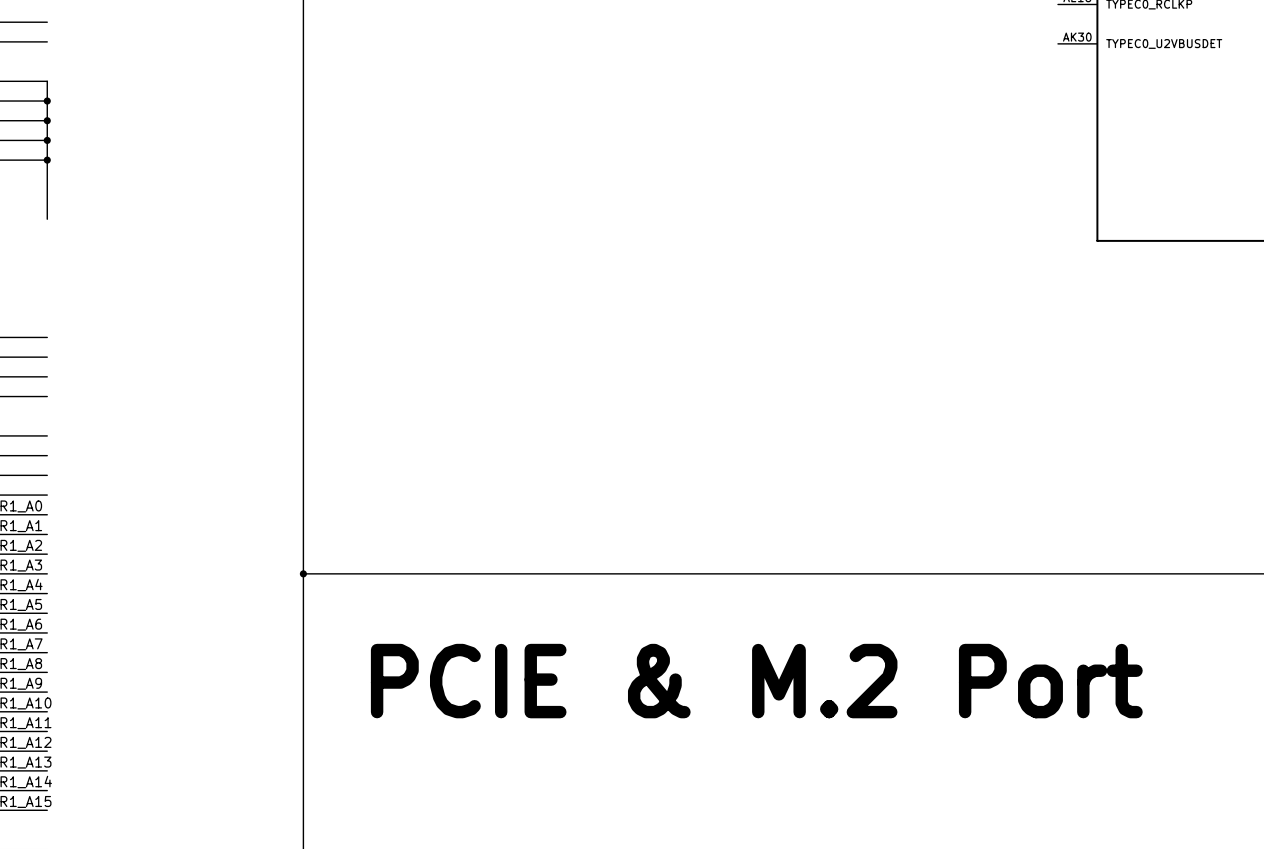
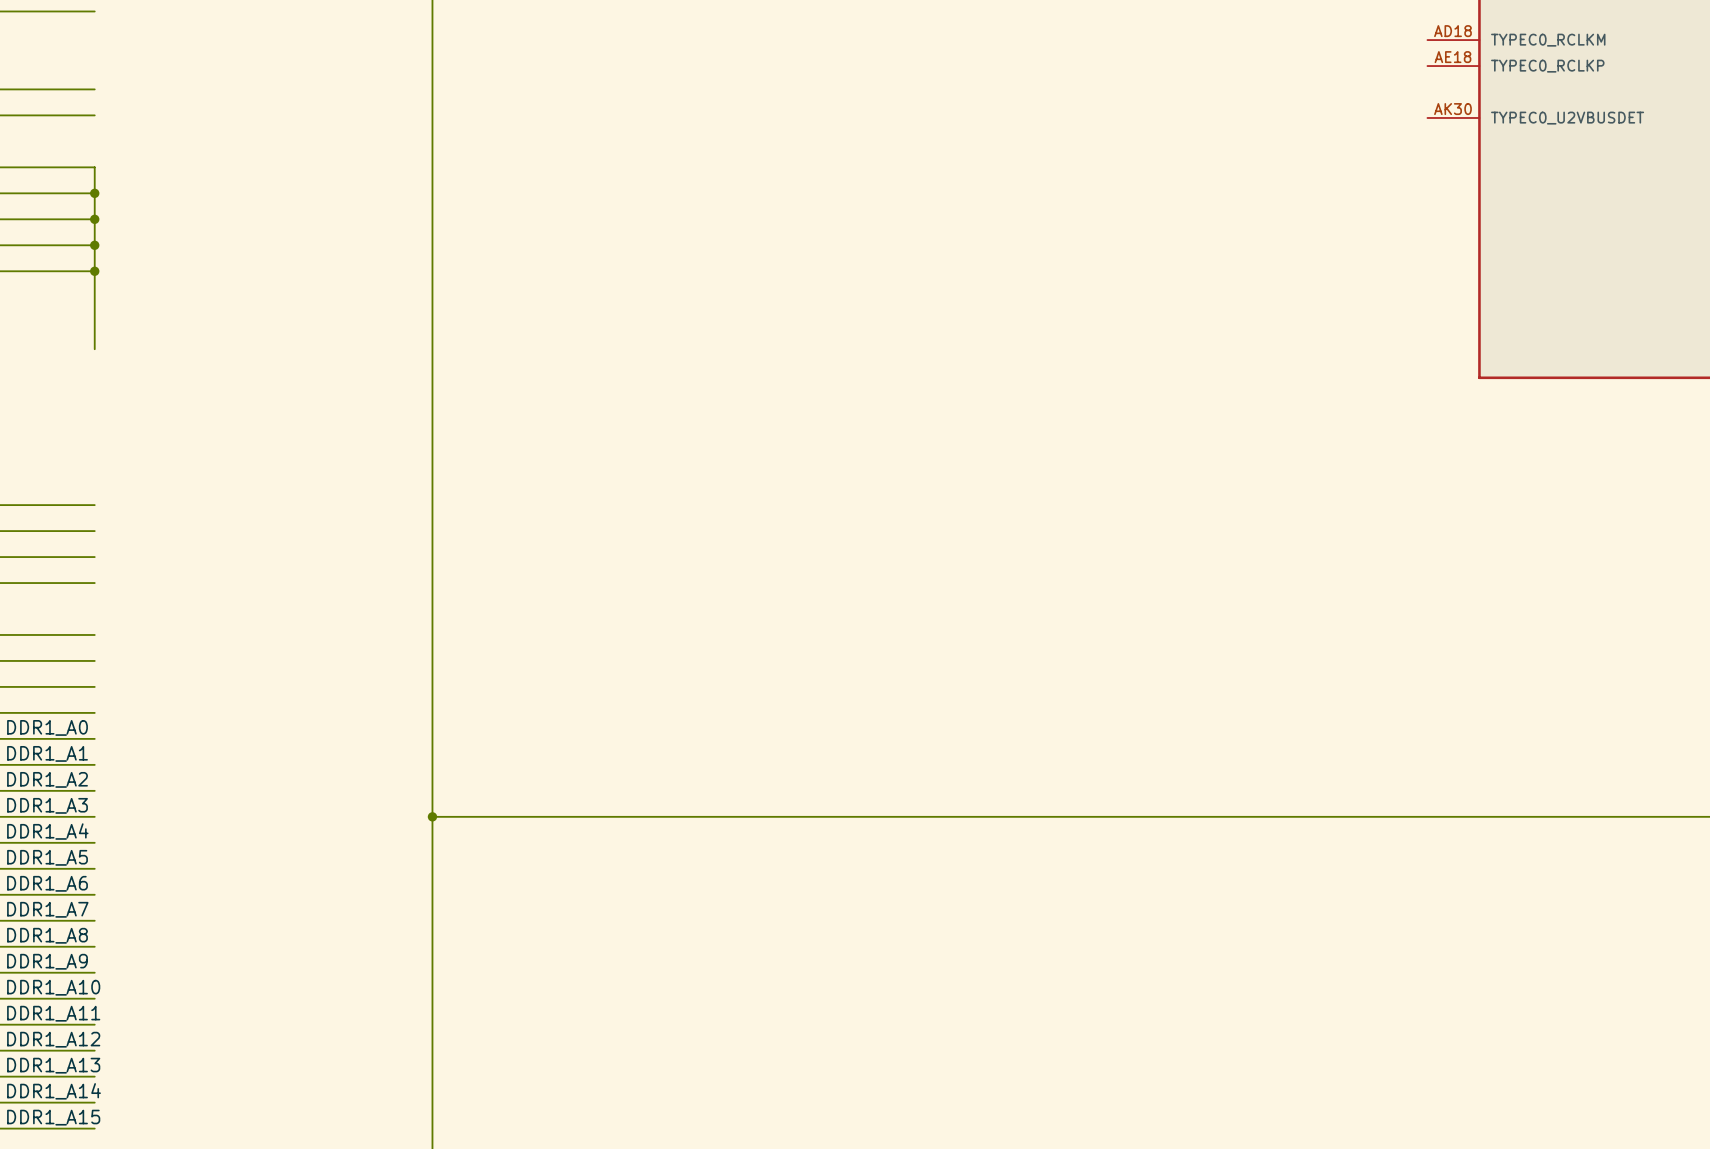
text: PCIE & M.2 Port (756, 681) -> none

